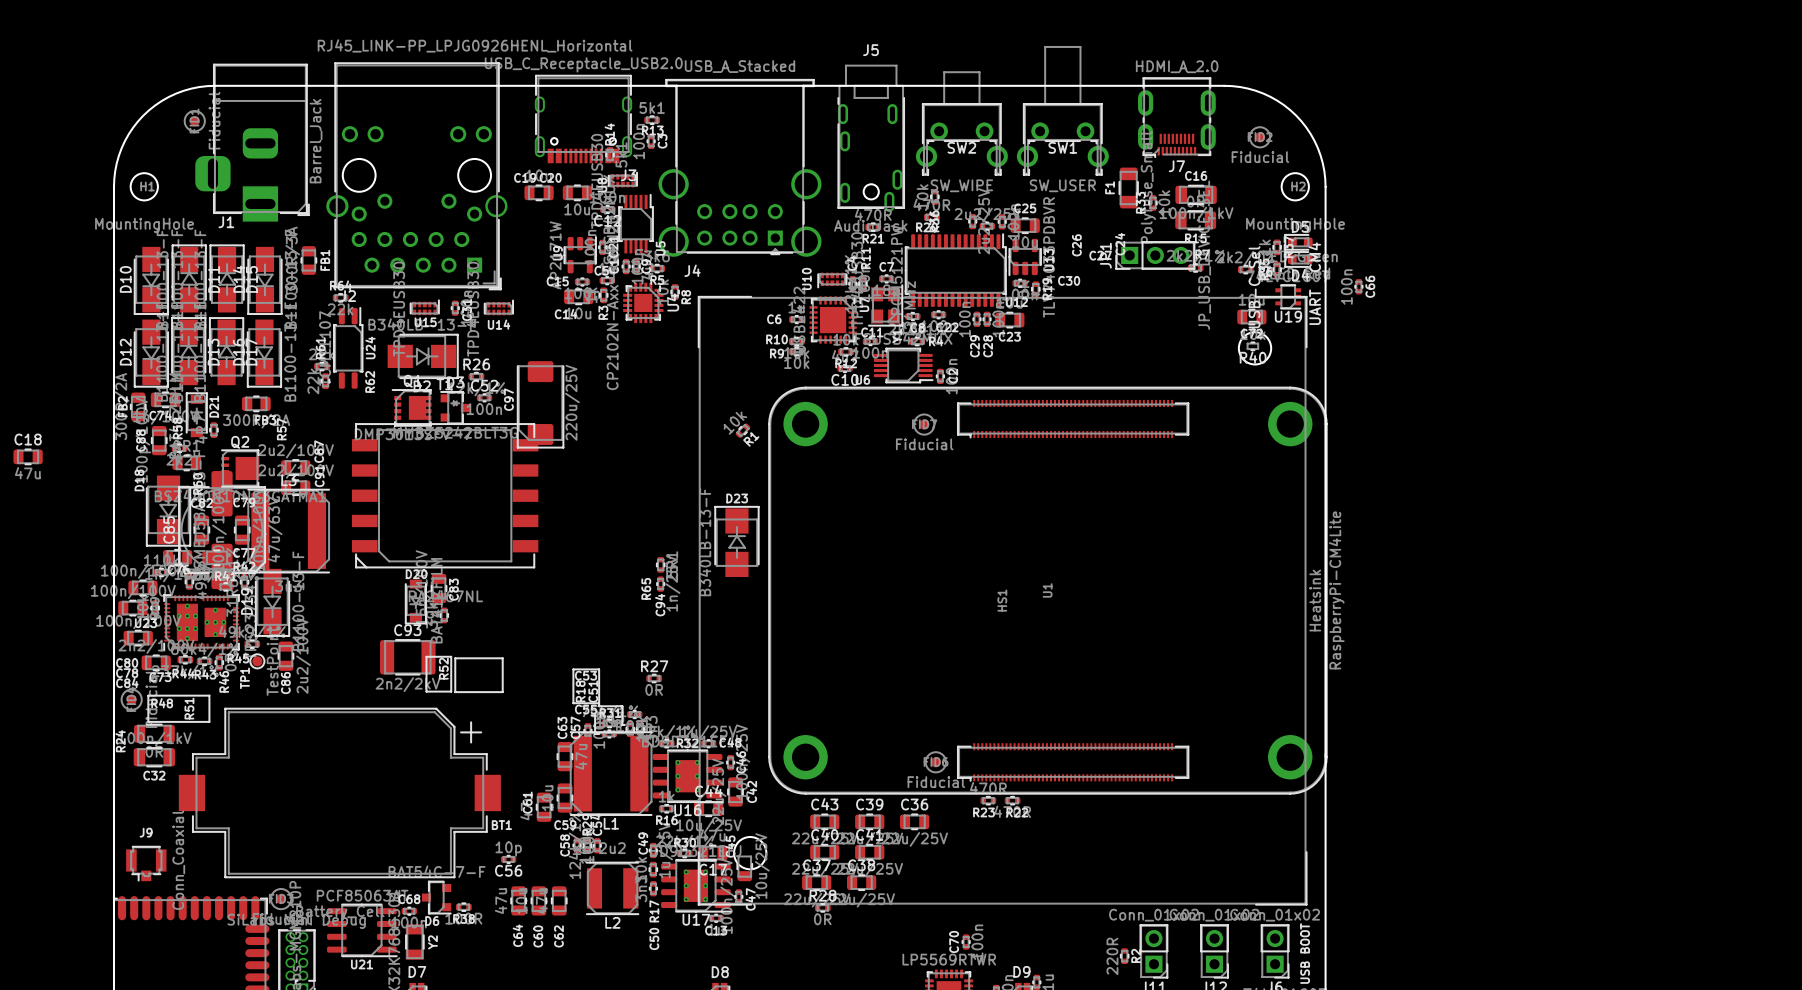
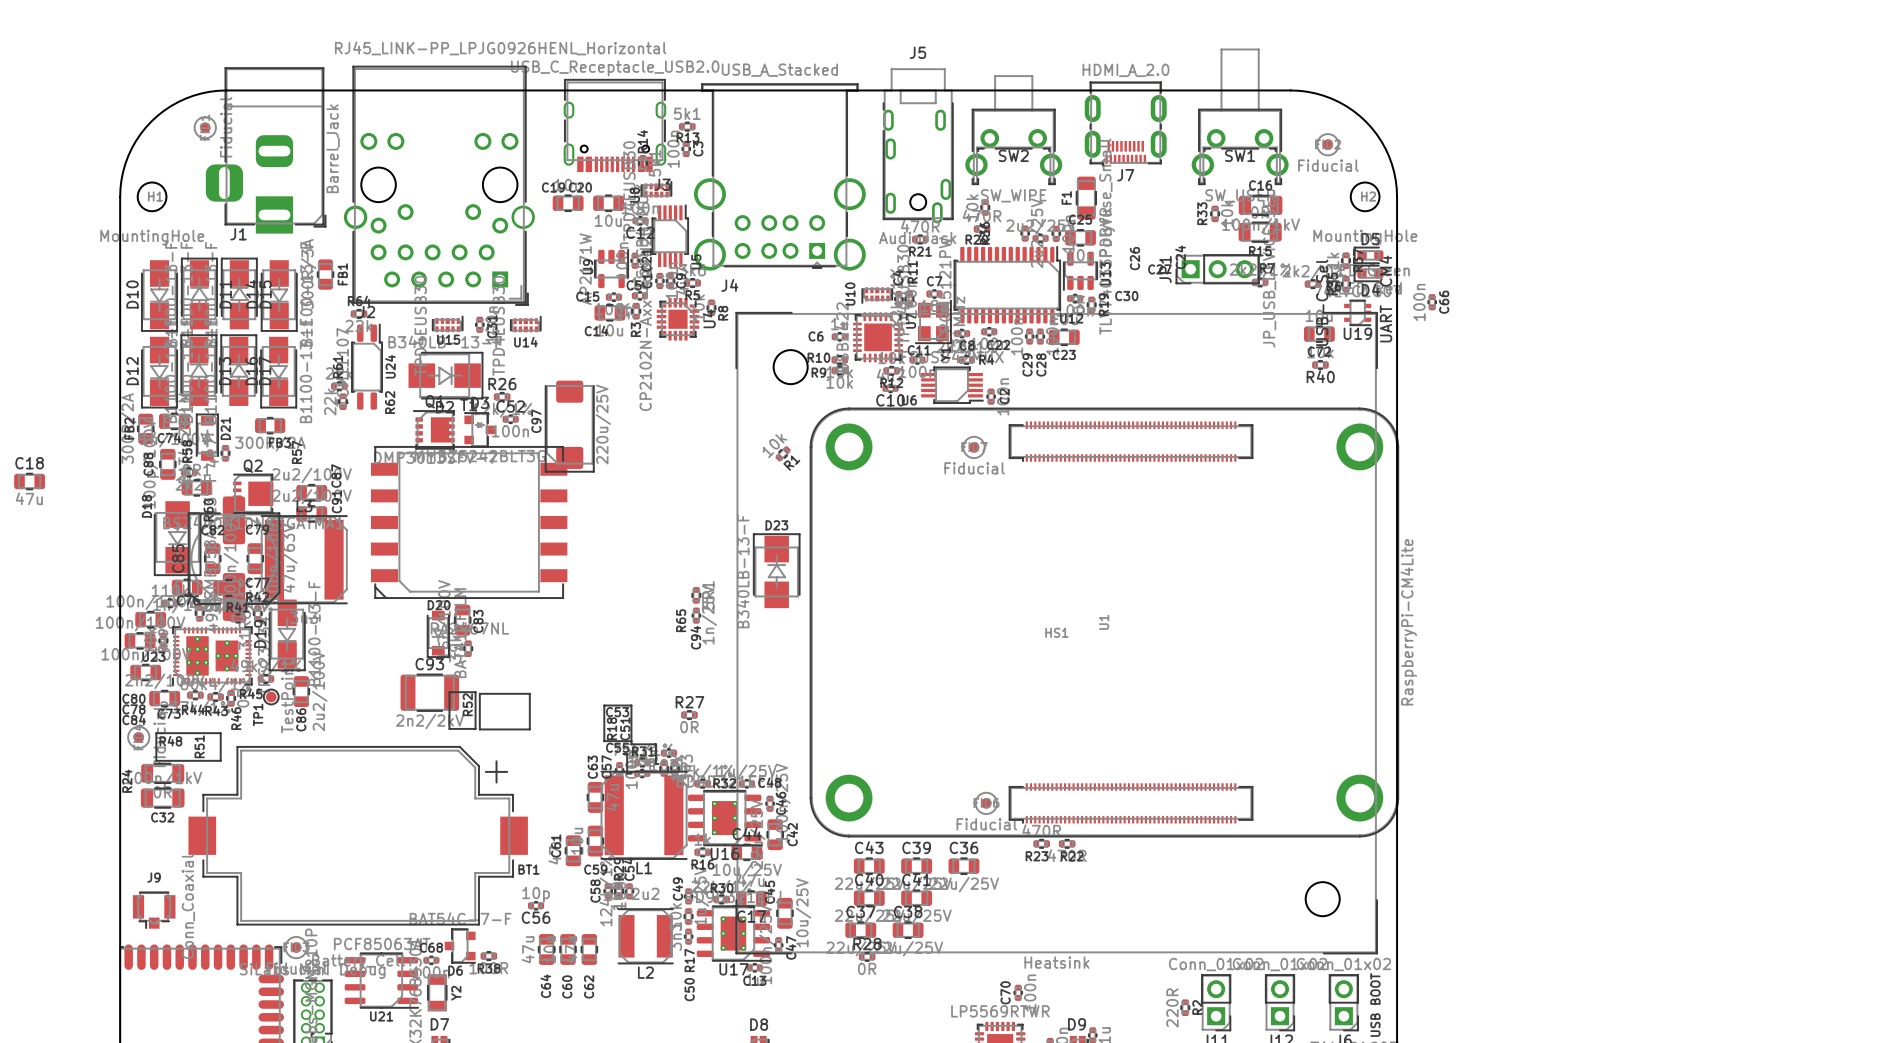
SW1 position: (1062, 110) -> (1240, 116)
J7 position: (1176, 117) -> (1125, 123)
F1 position: (1128, 188) -> (1086, 198)
HS1 rotation: 0° (1002, 600) -> 90° clockwise (1056, 633)

